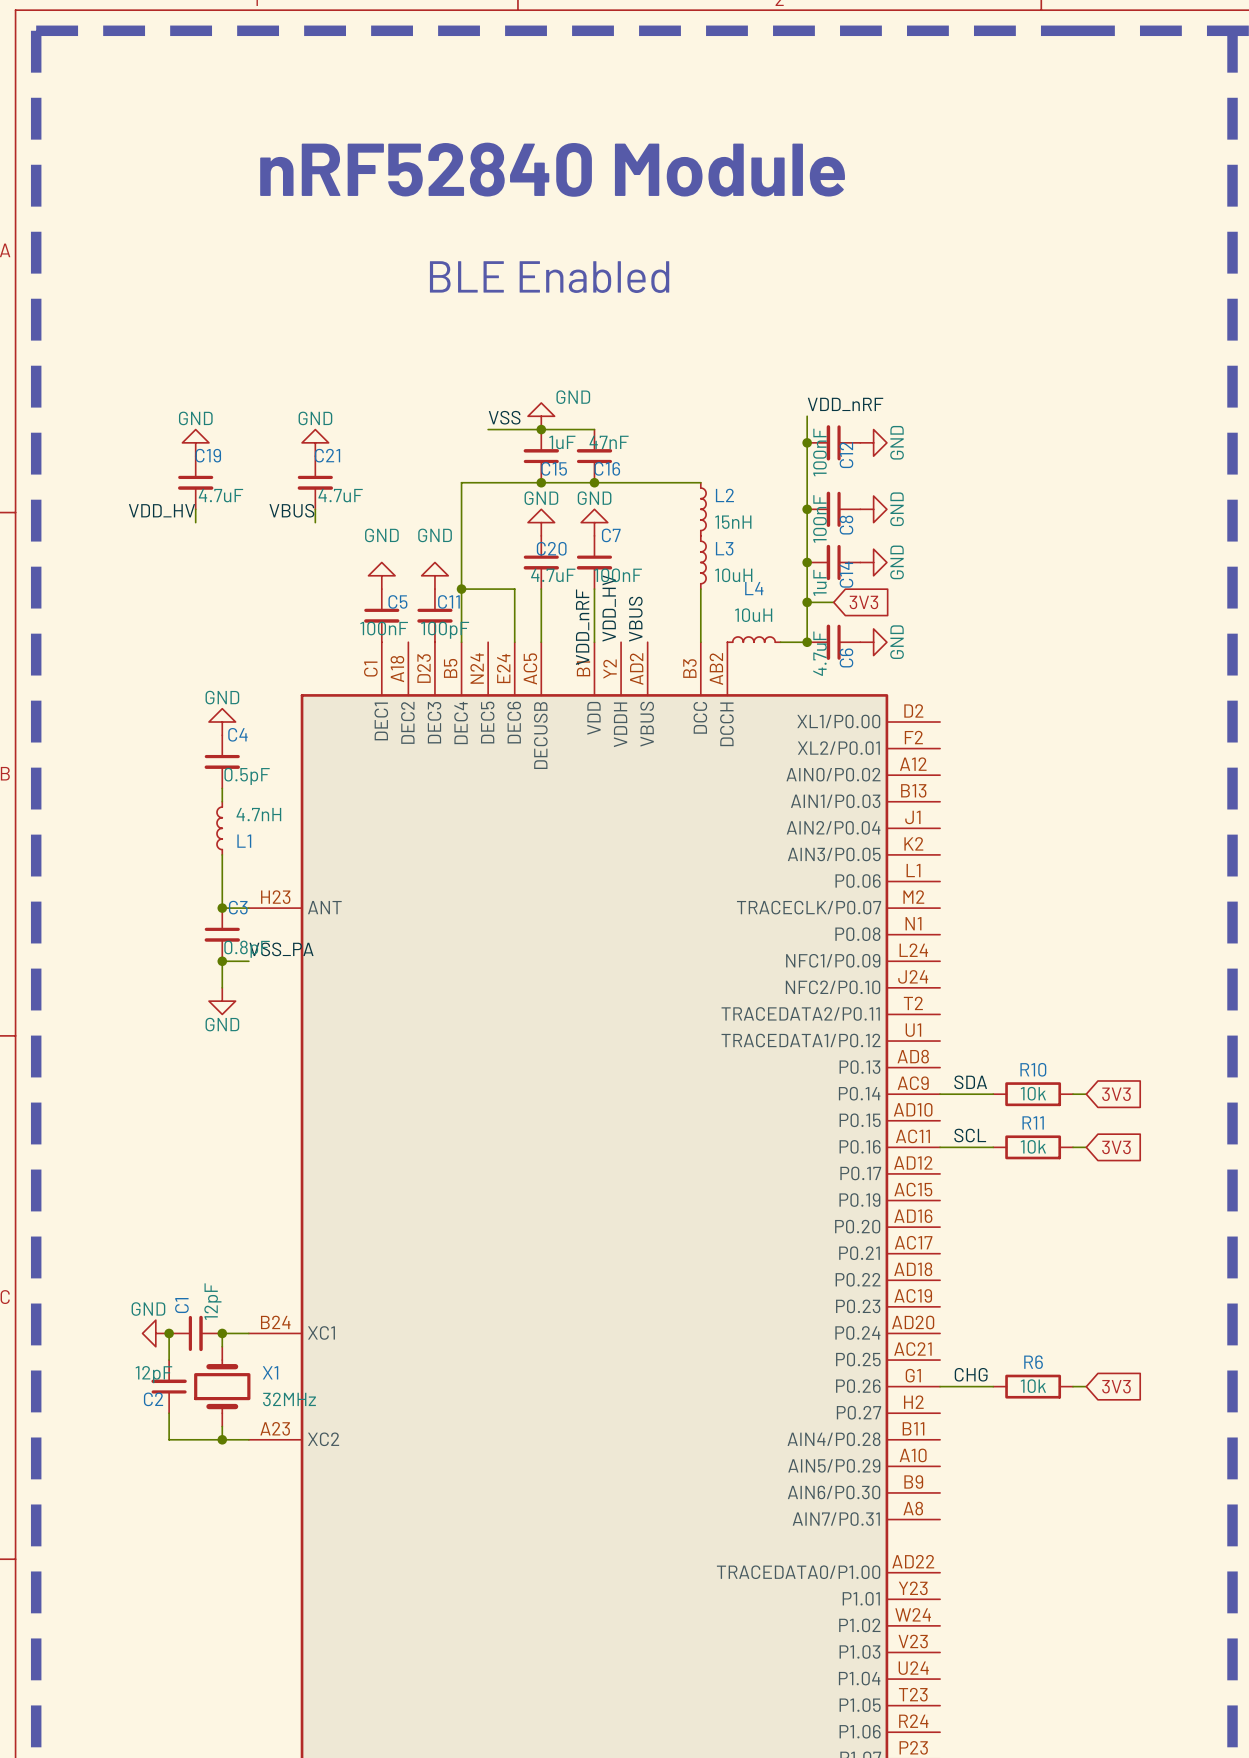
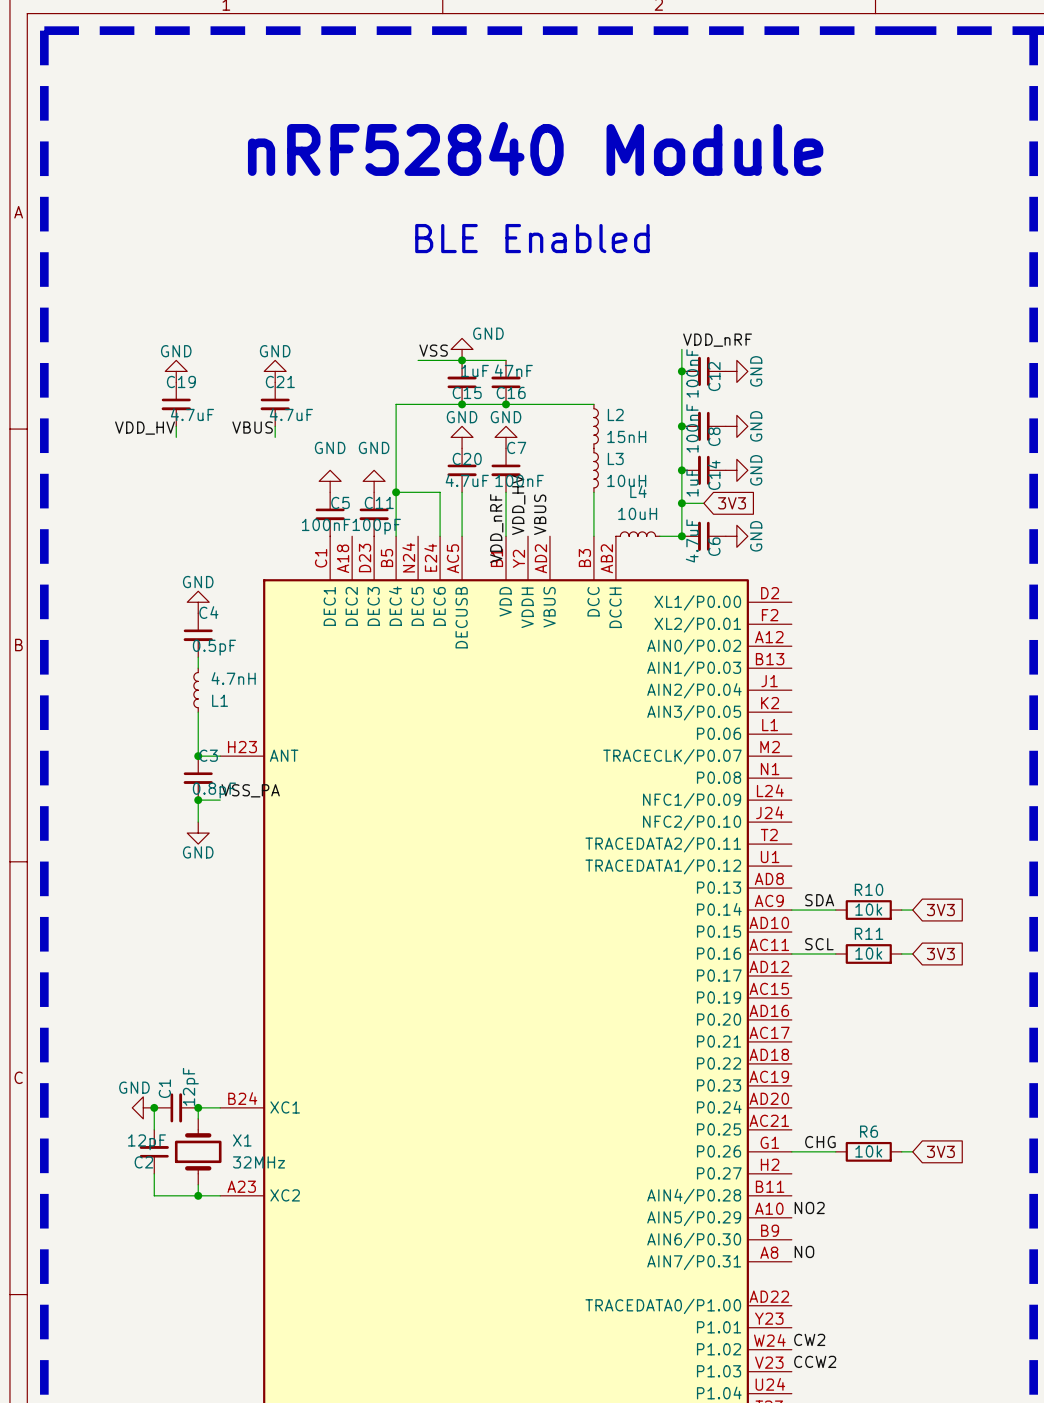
text position: nRF52840 Module (552, 169) -> nRF52840 Module (535, 148)
text position: BLE Enabled (549, 277) -> BLE Enabled (532, 238)
label: none -> NO2 (809, 1208)
label: none -> NO (804, 1251)
label: none -> CW2 (809, 1339)
label: none -> CCW2 (815, 1361)

